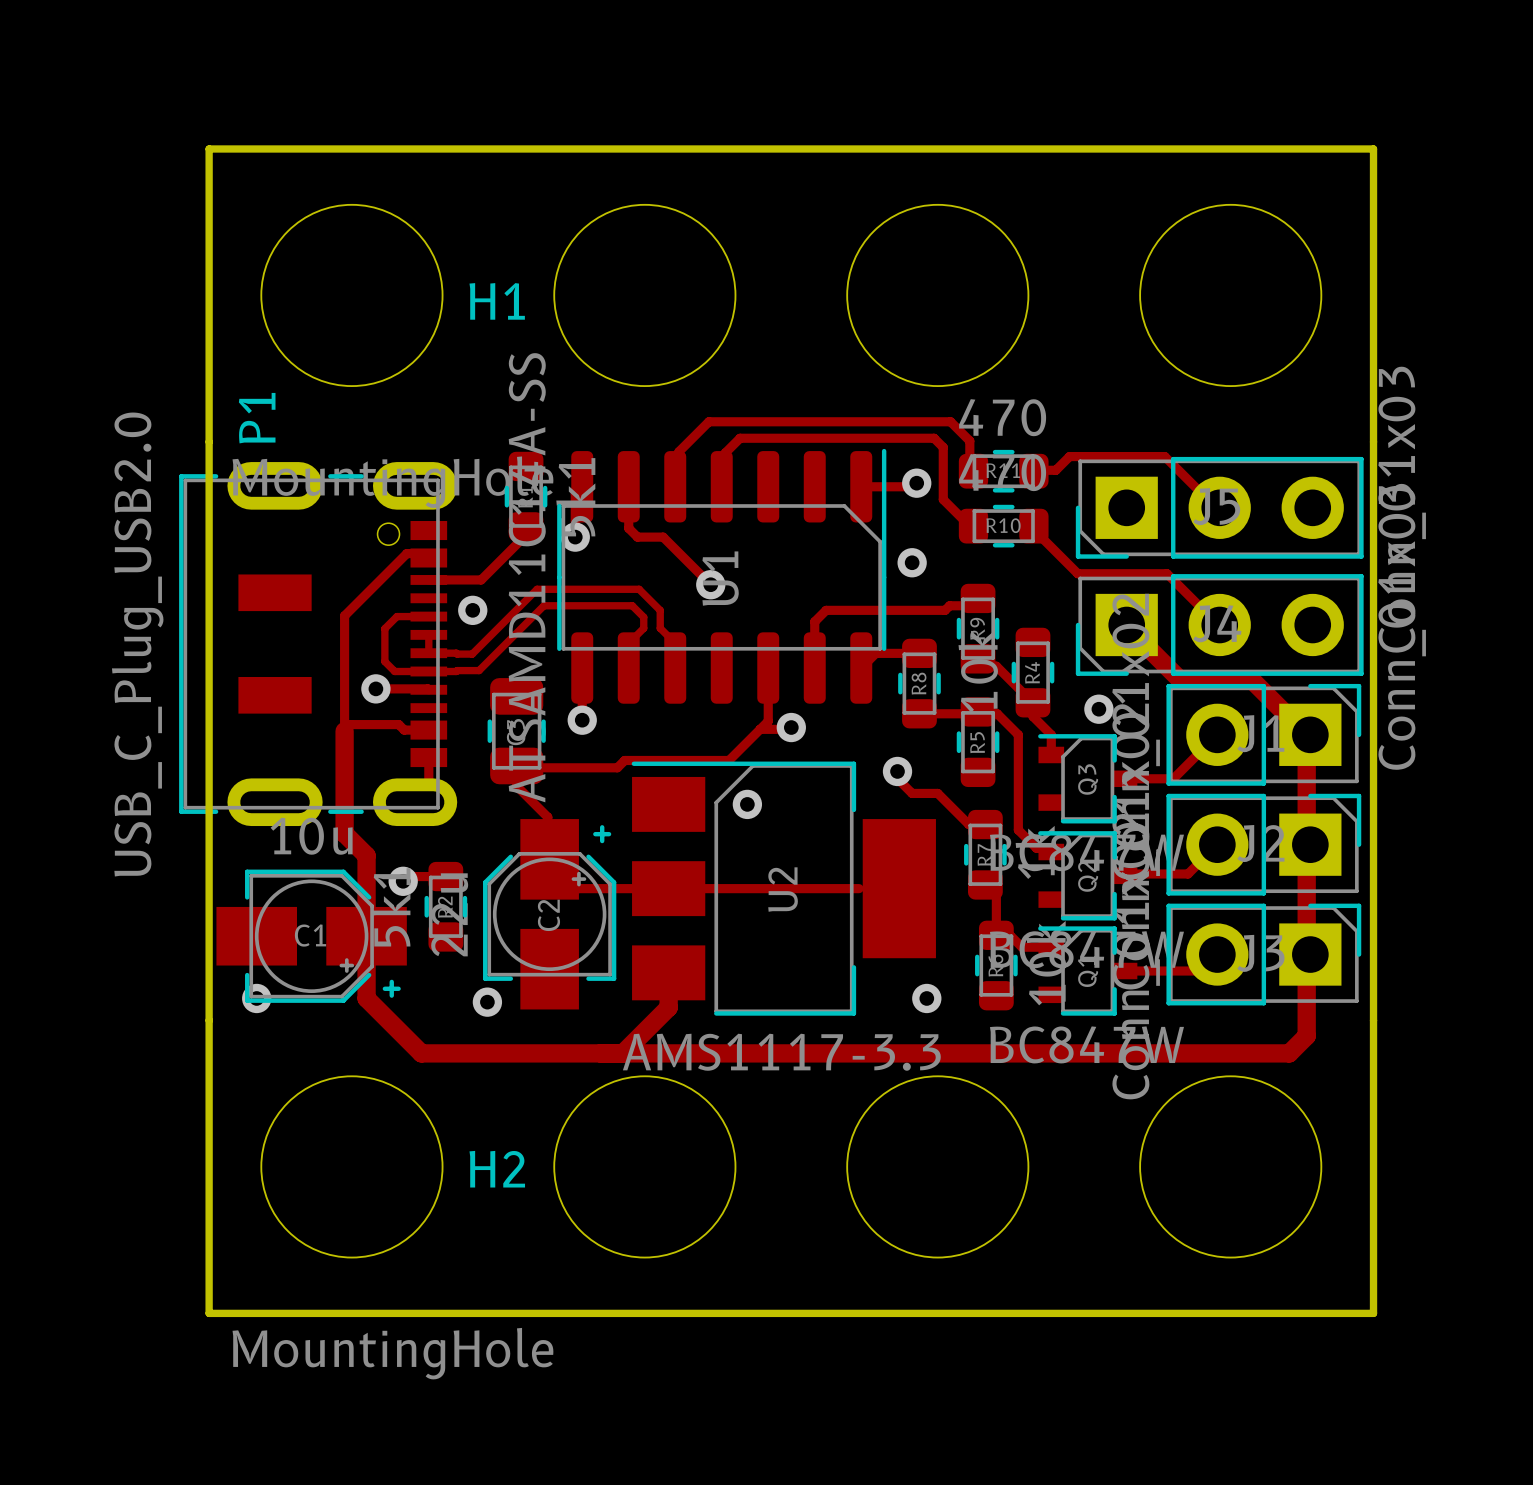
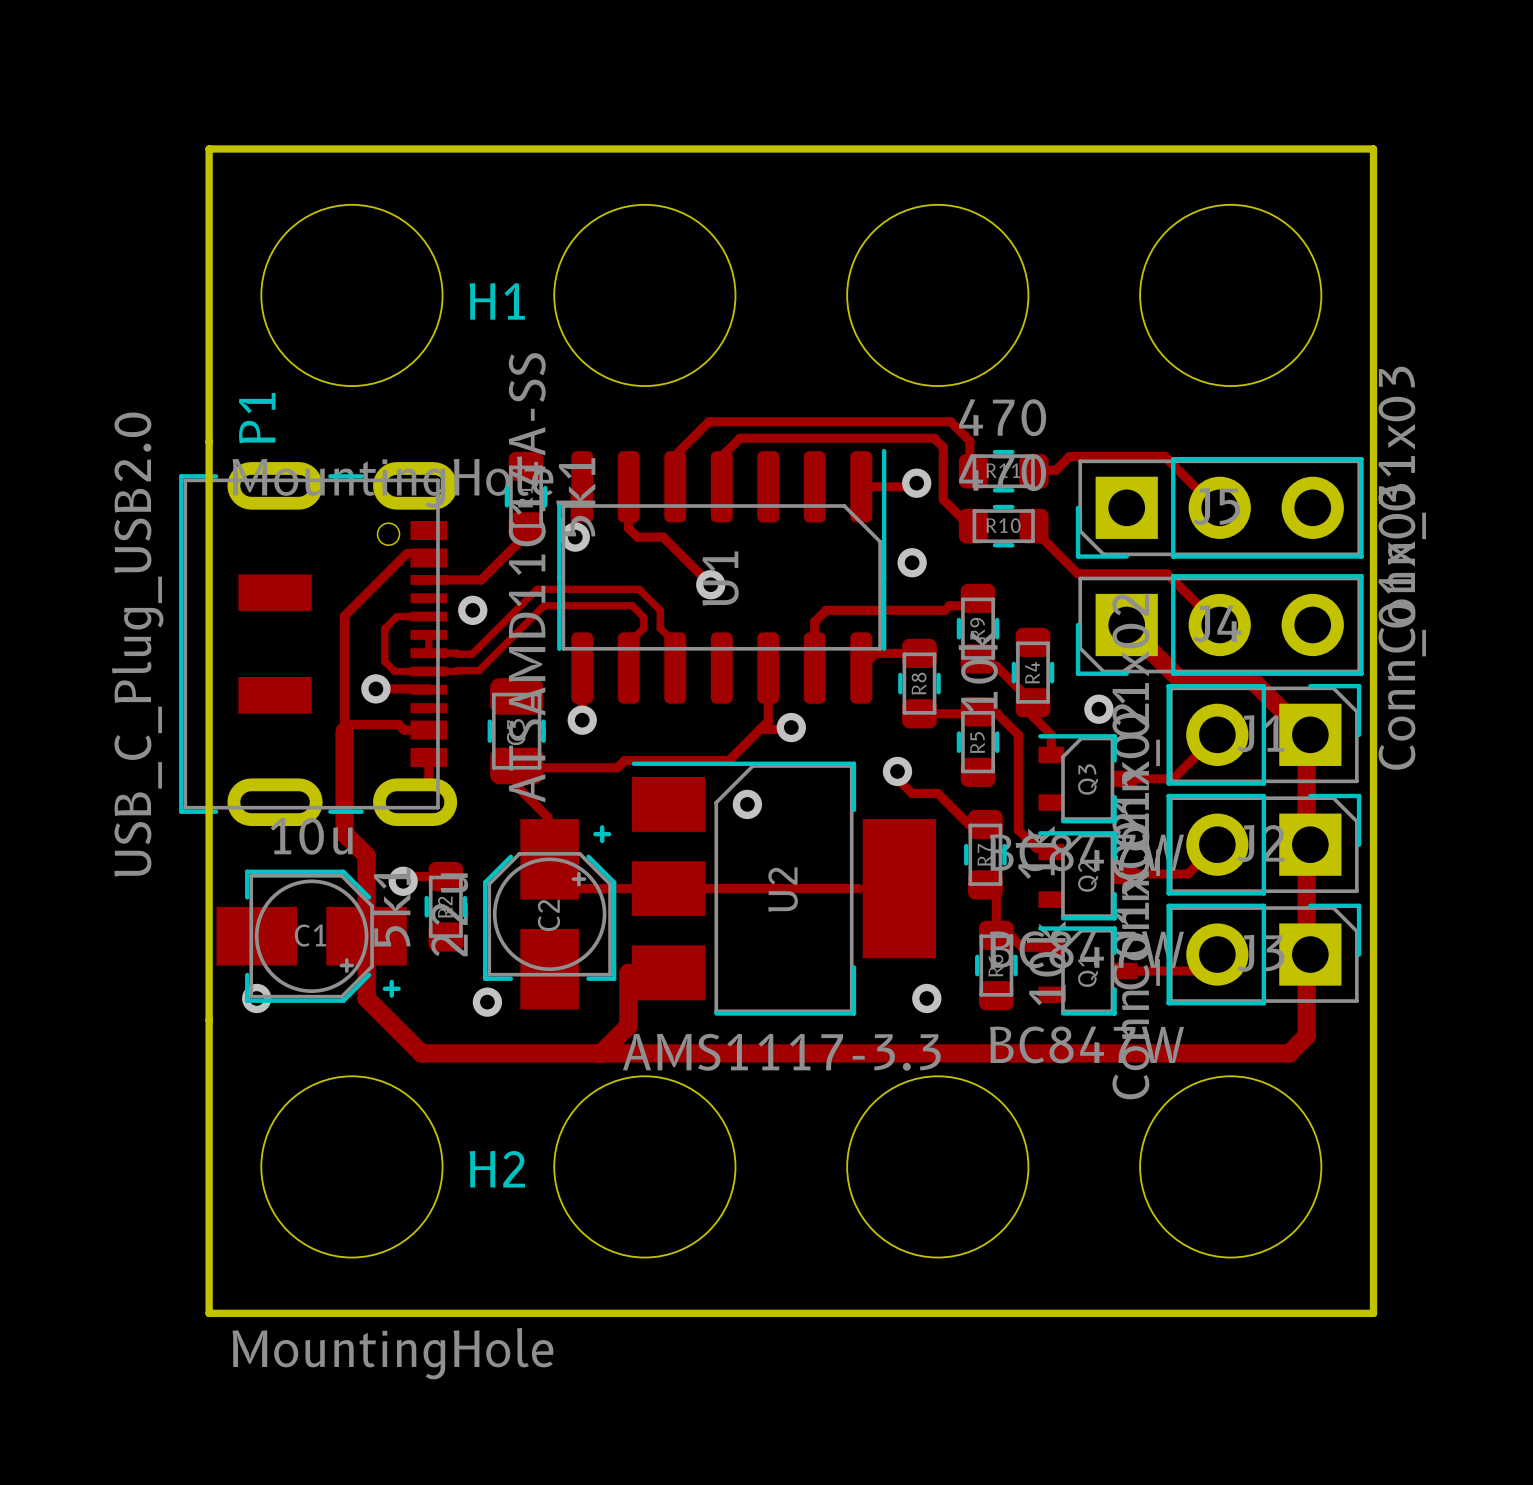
track: none -> (628, 972) (628, 1025) (600, 1053)
track: (668, 972) (668, 1007) (622, 1053) -> none

